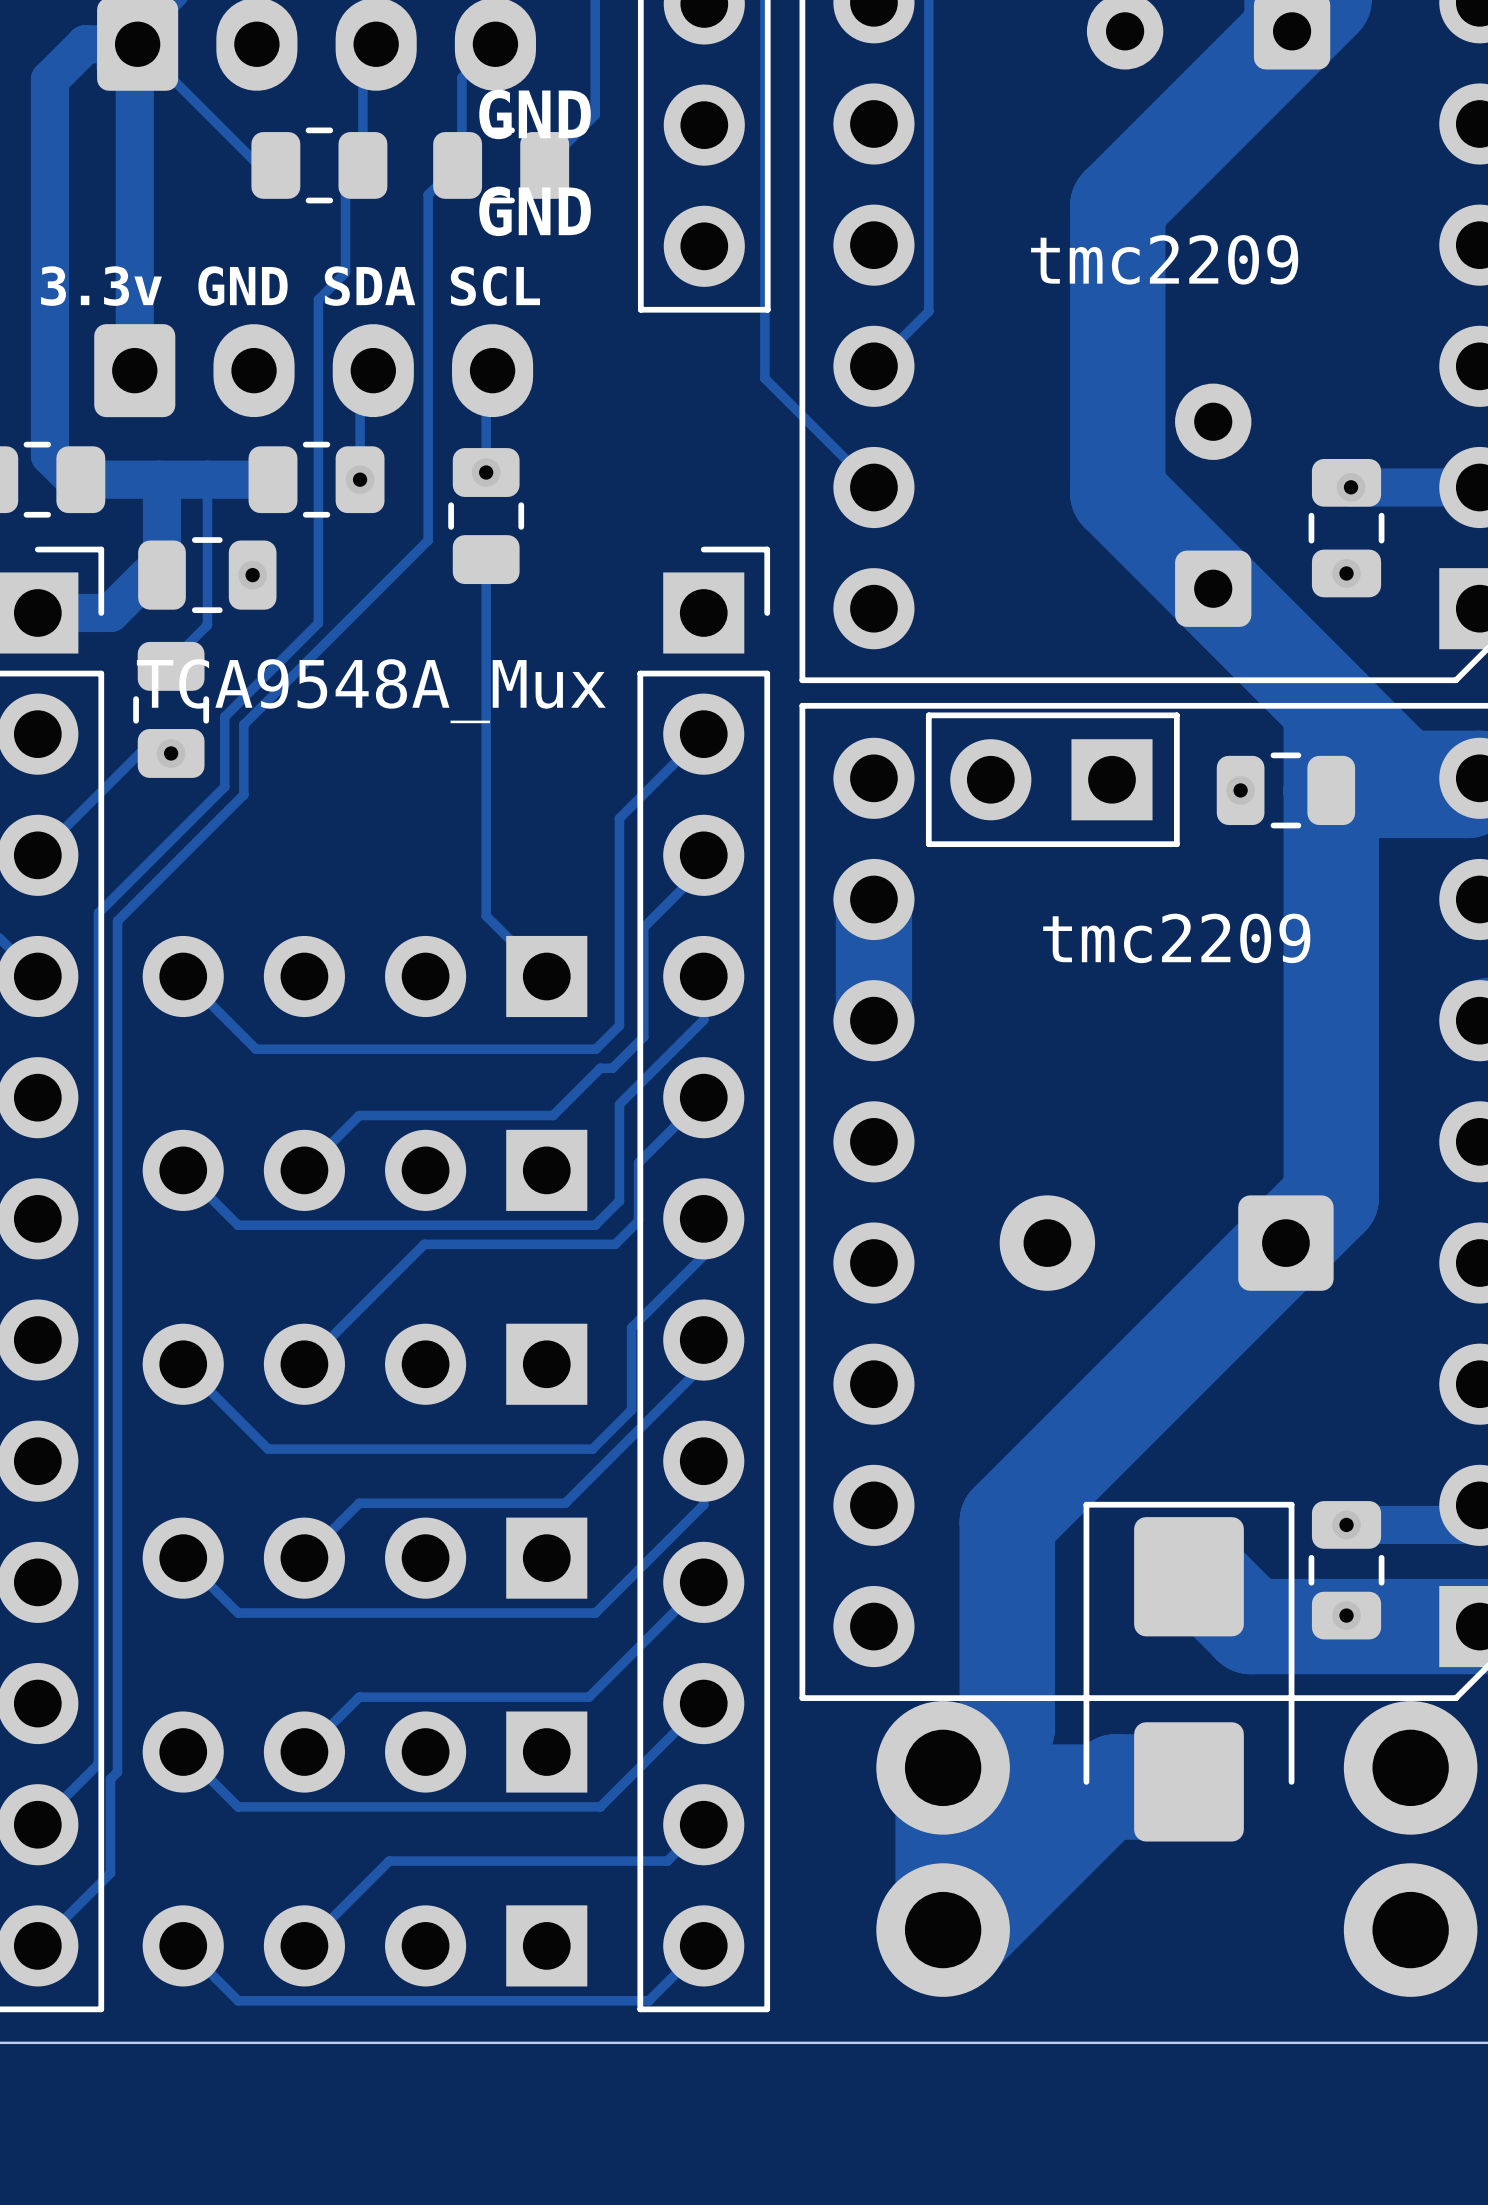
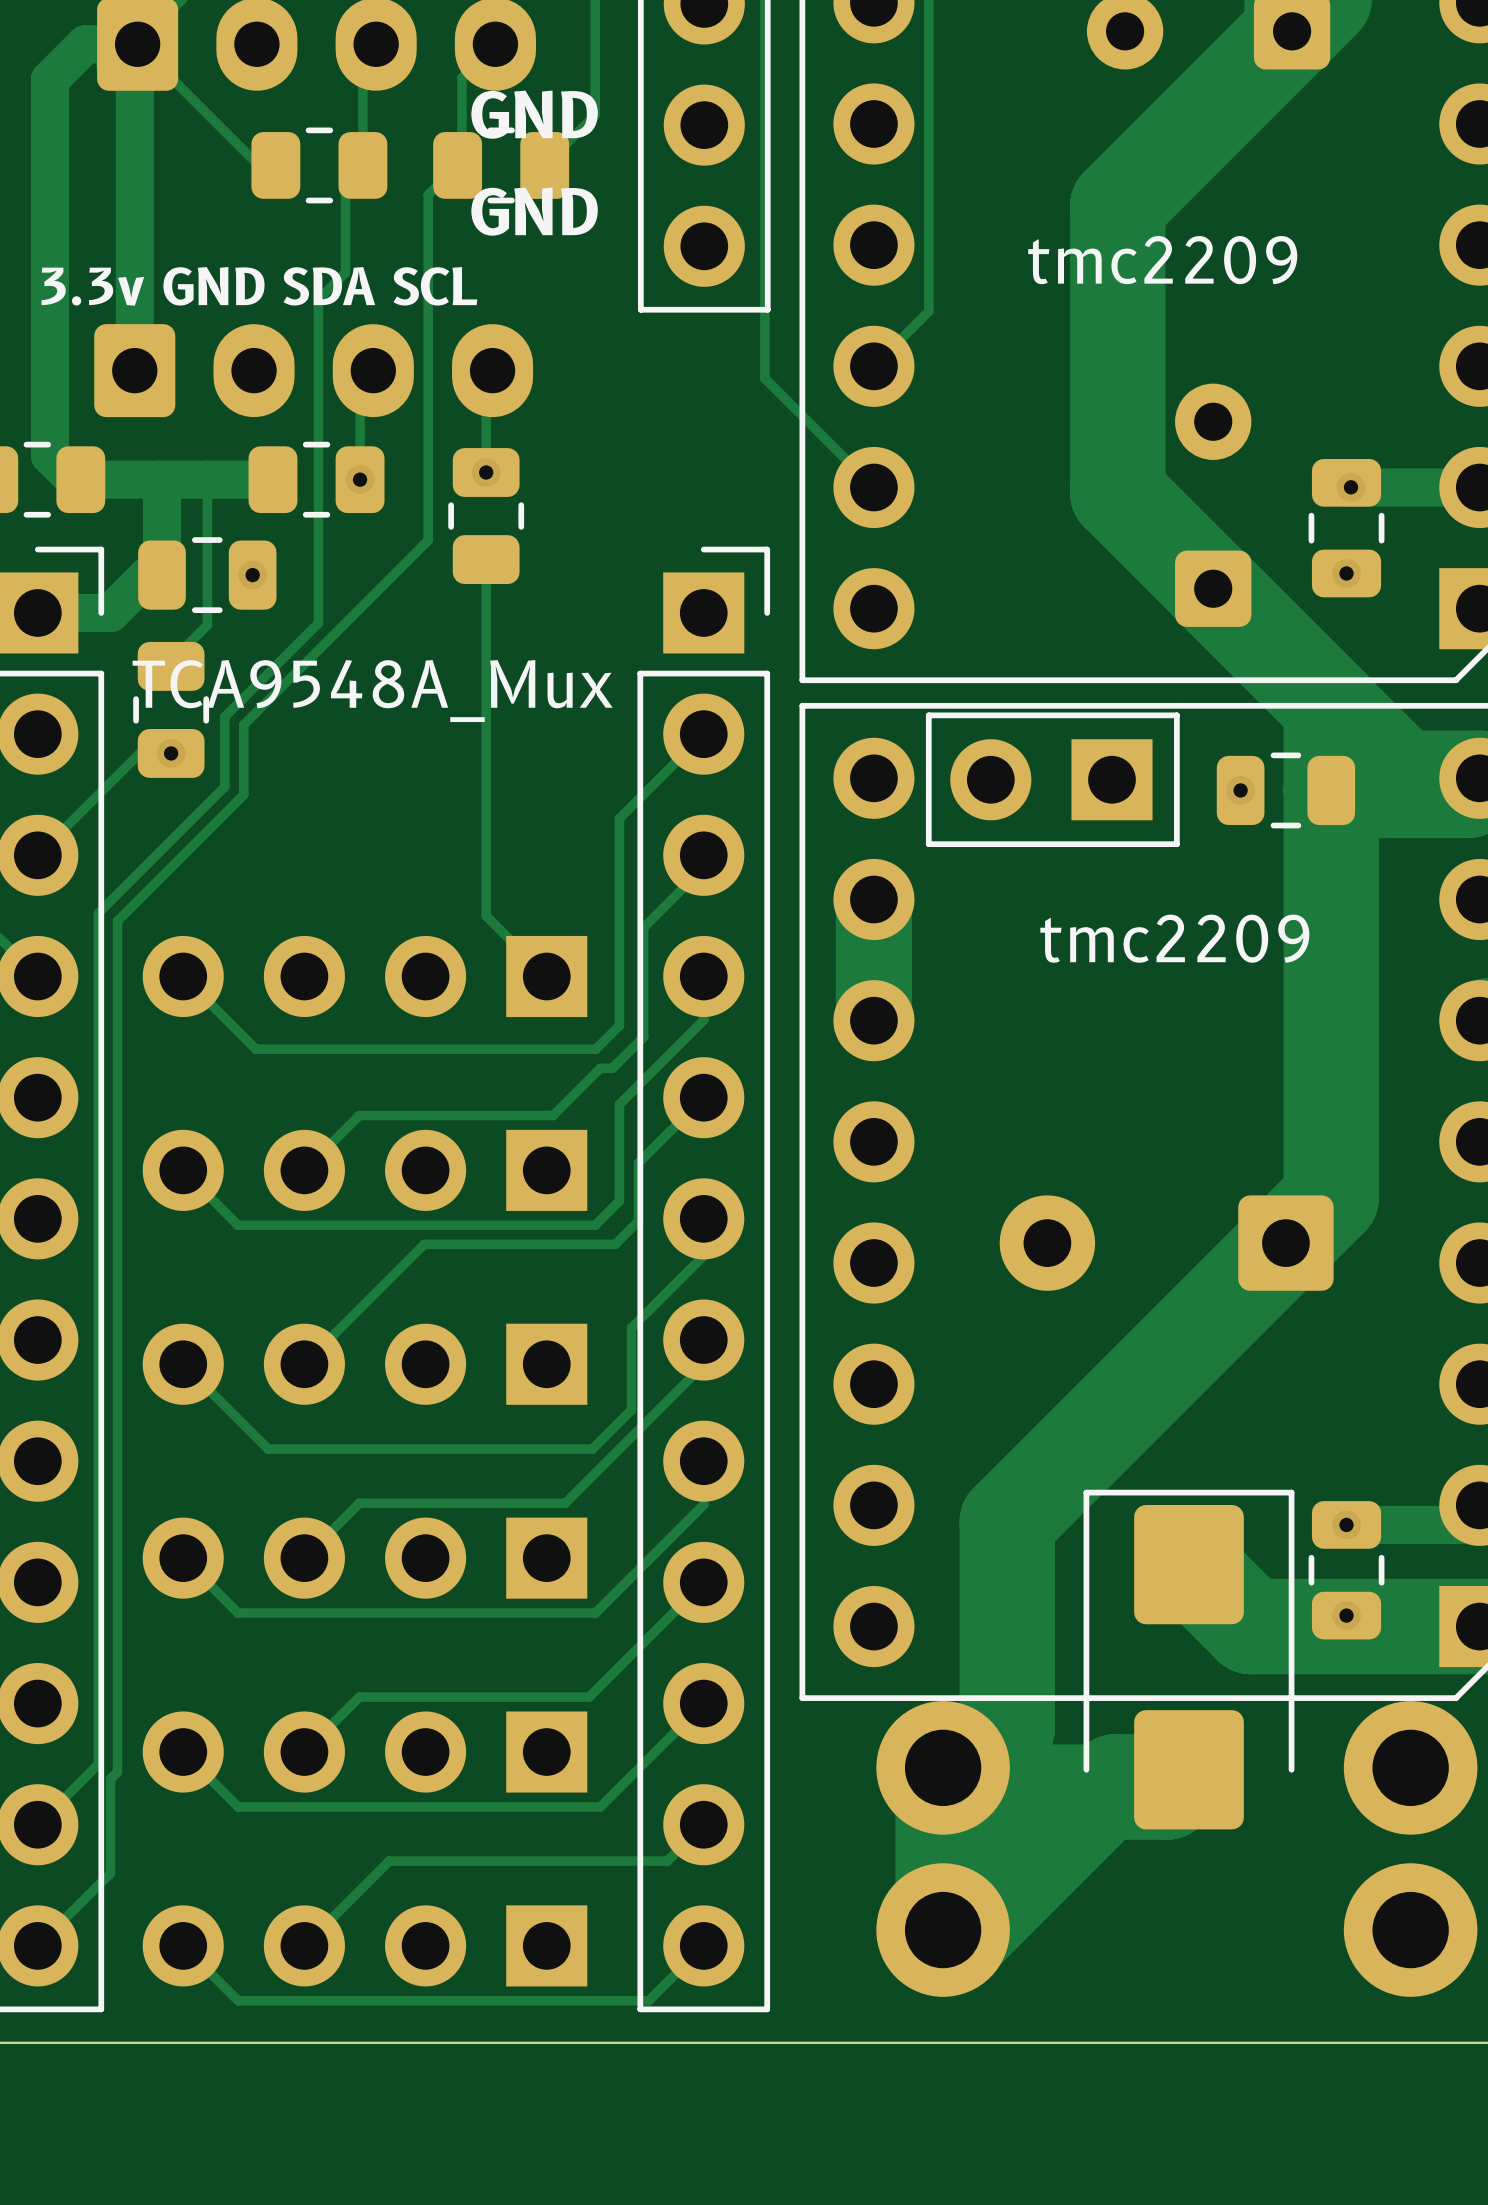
part position: (1188, 1671) -> (1188, 1659)

